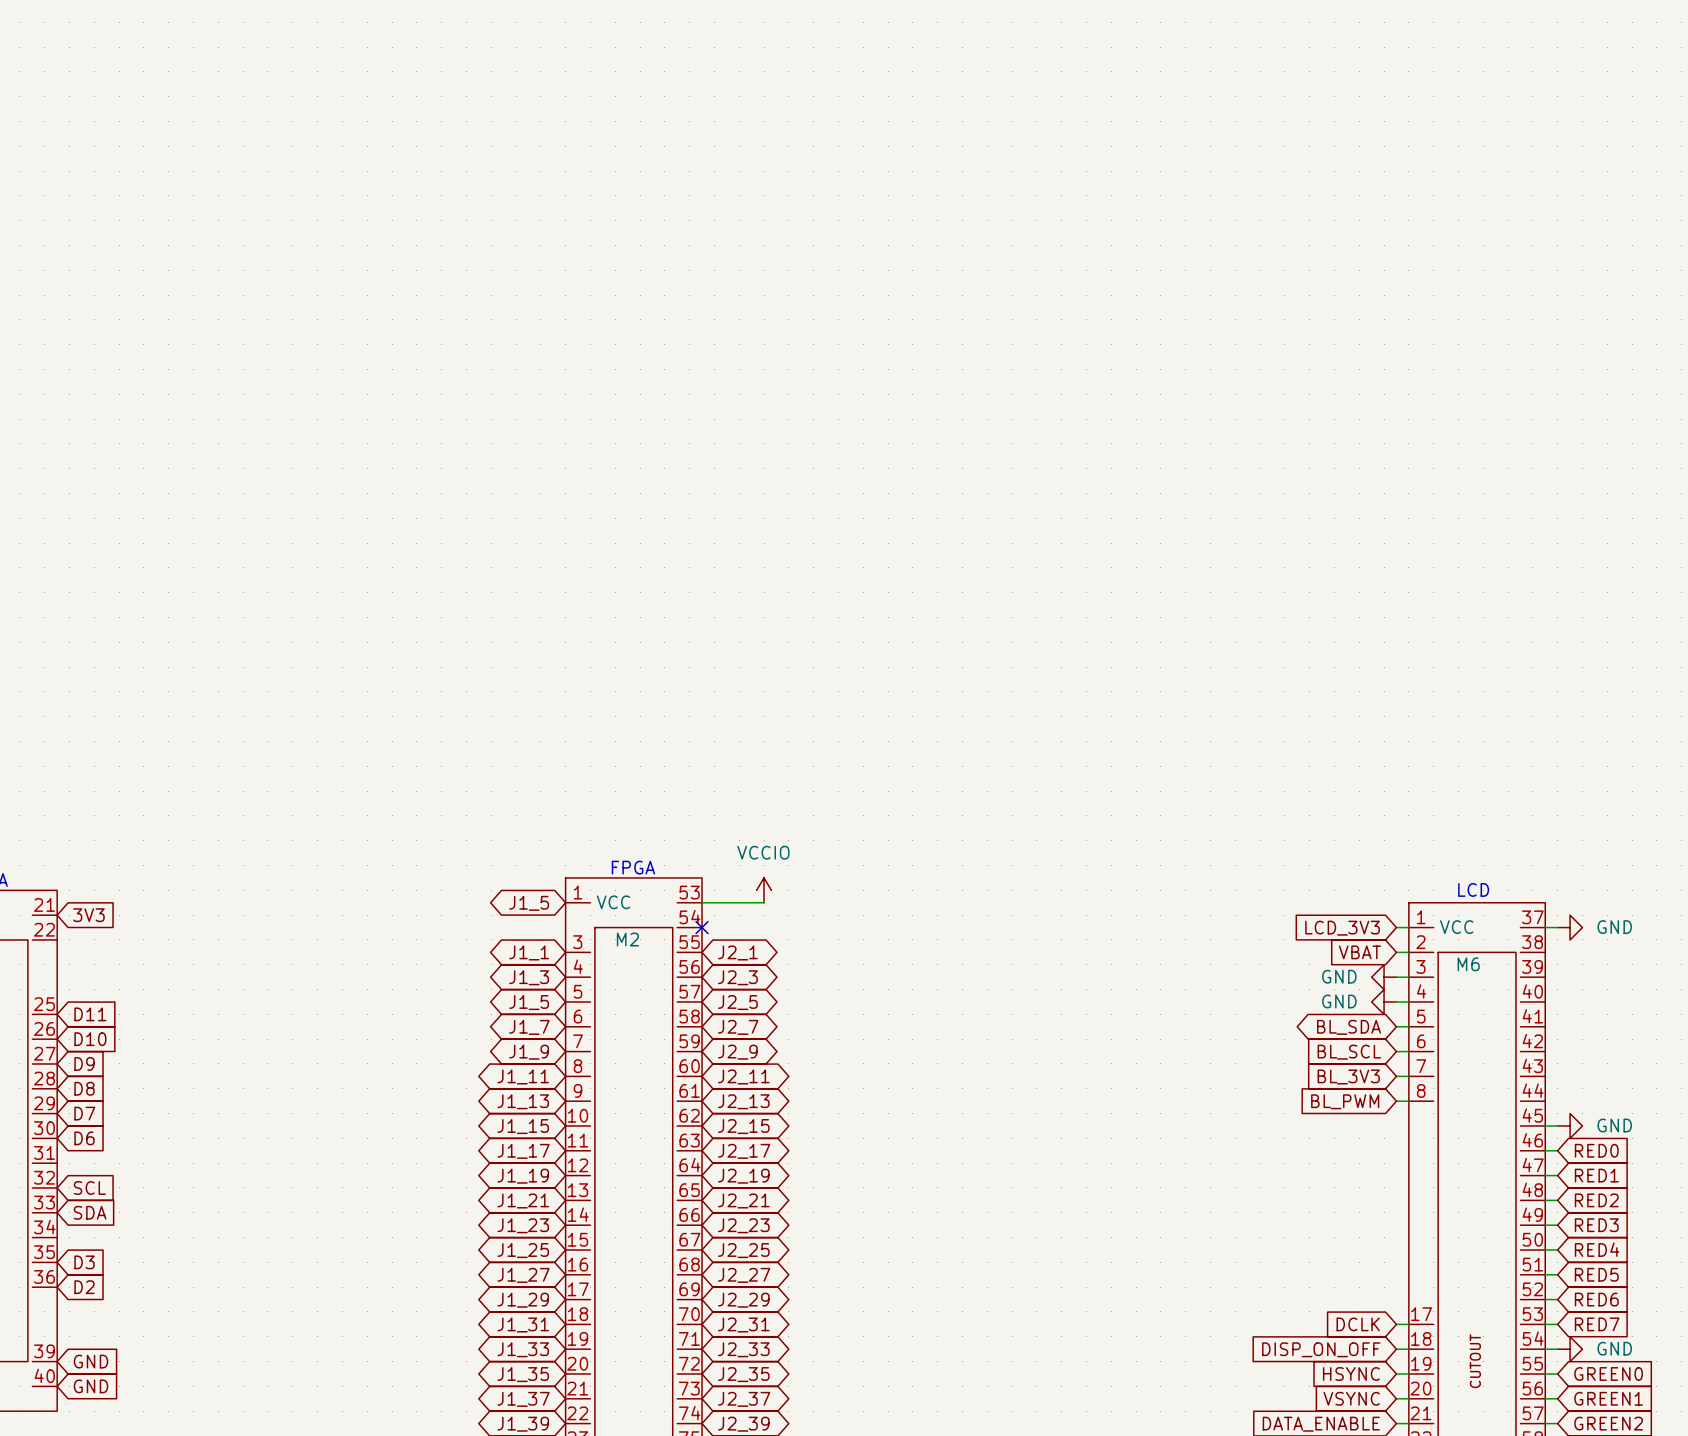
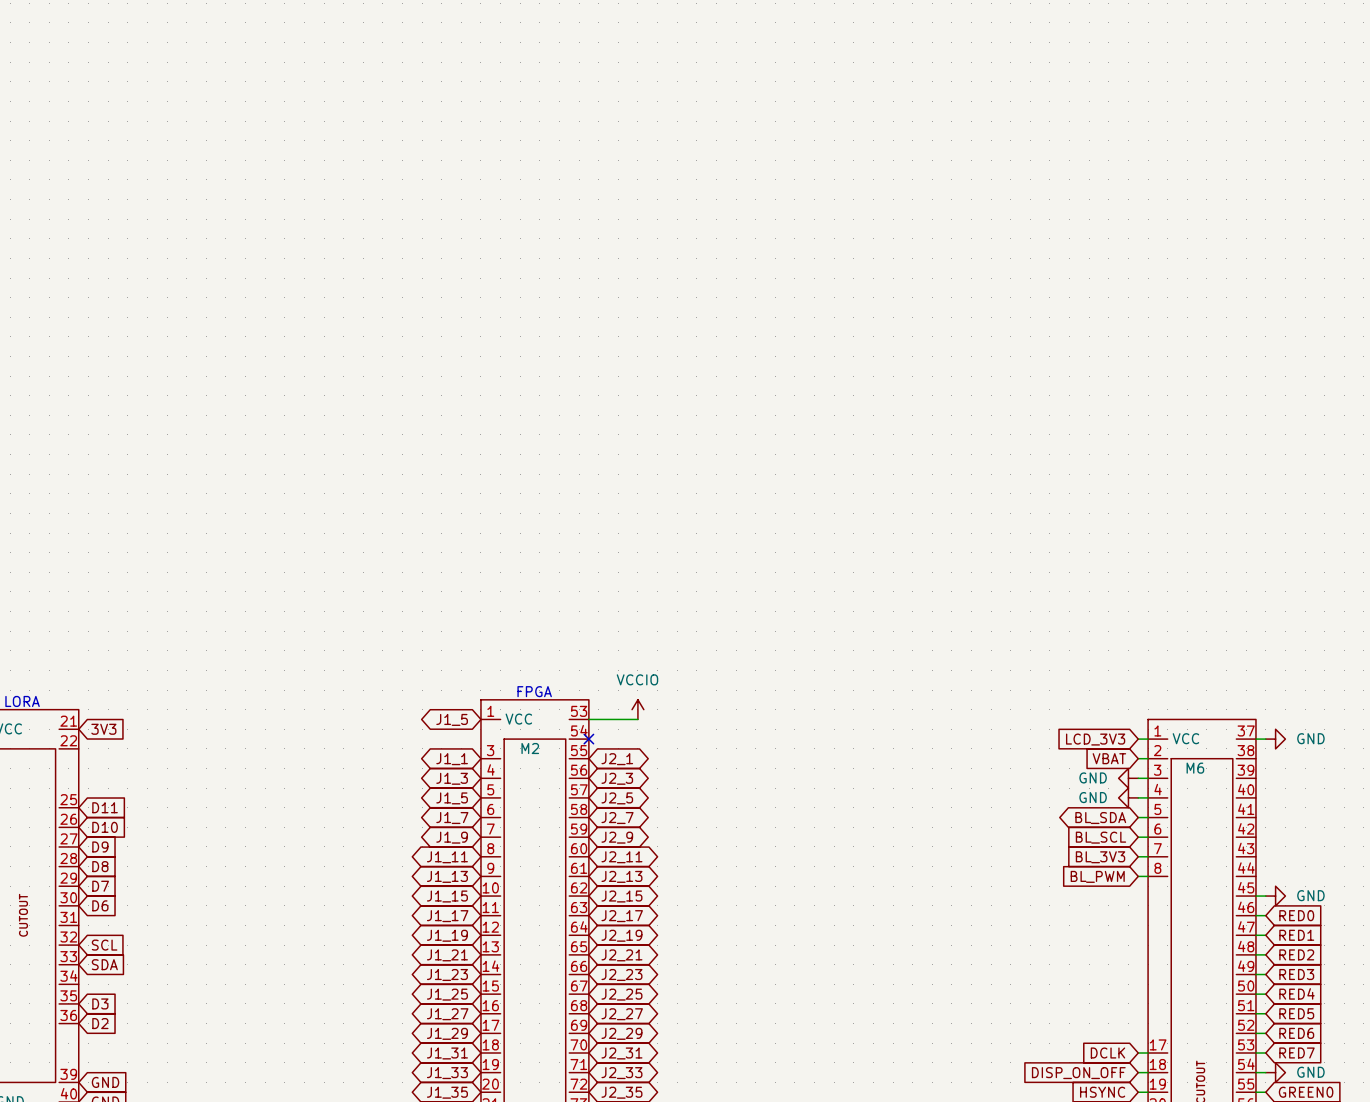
text: LCD (1473, 889) -> none

